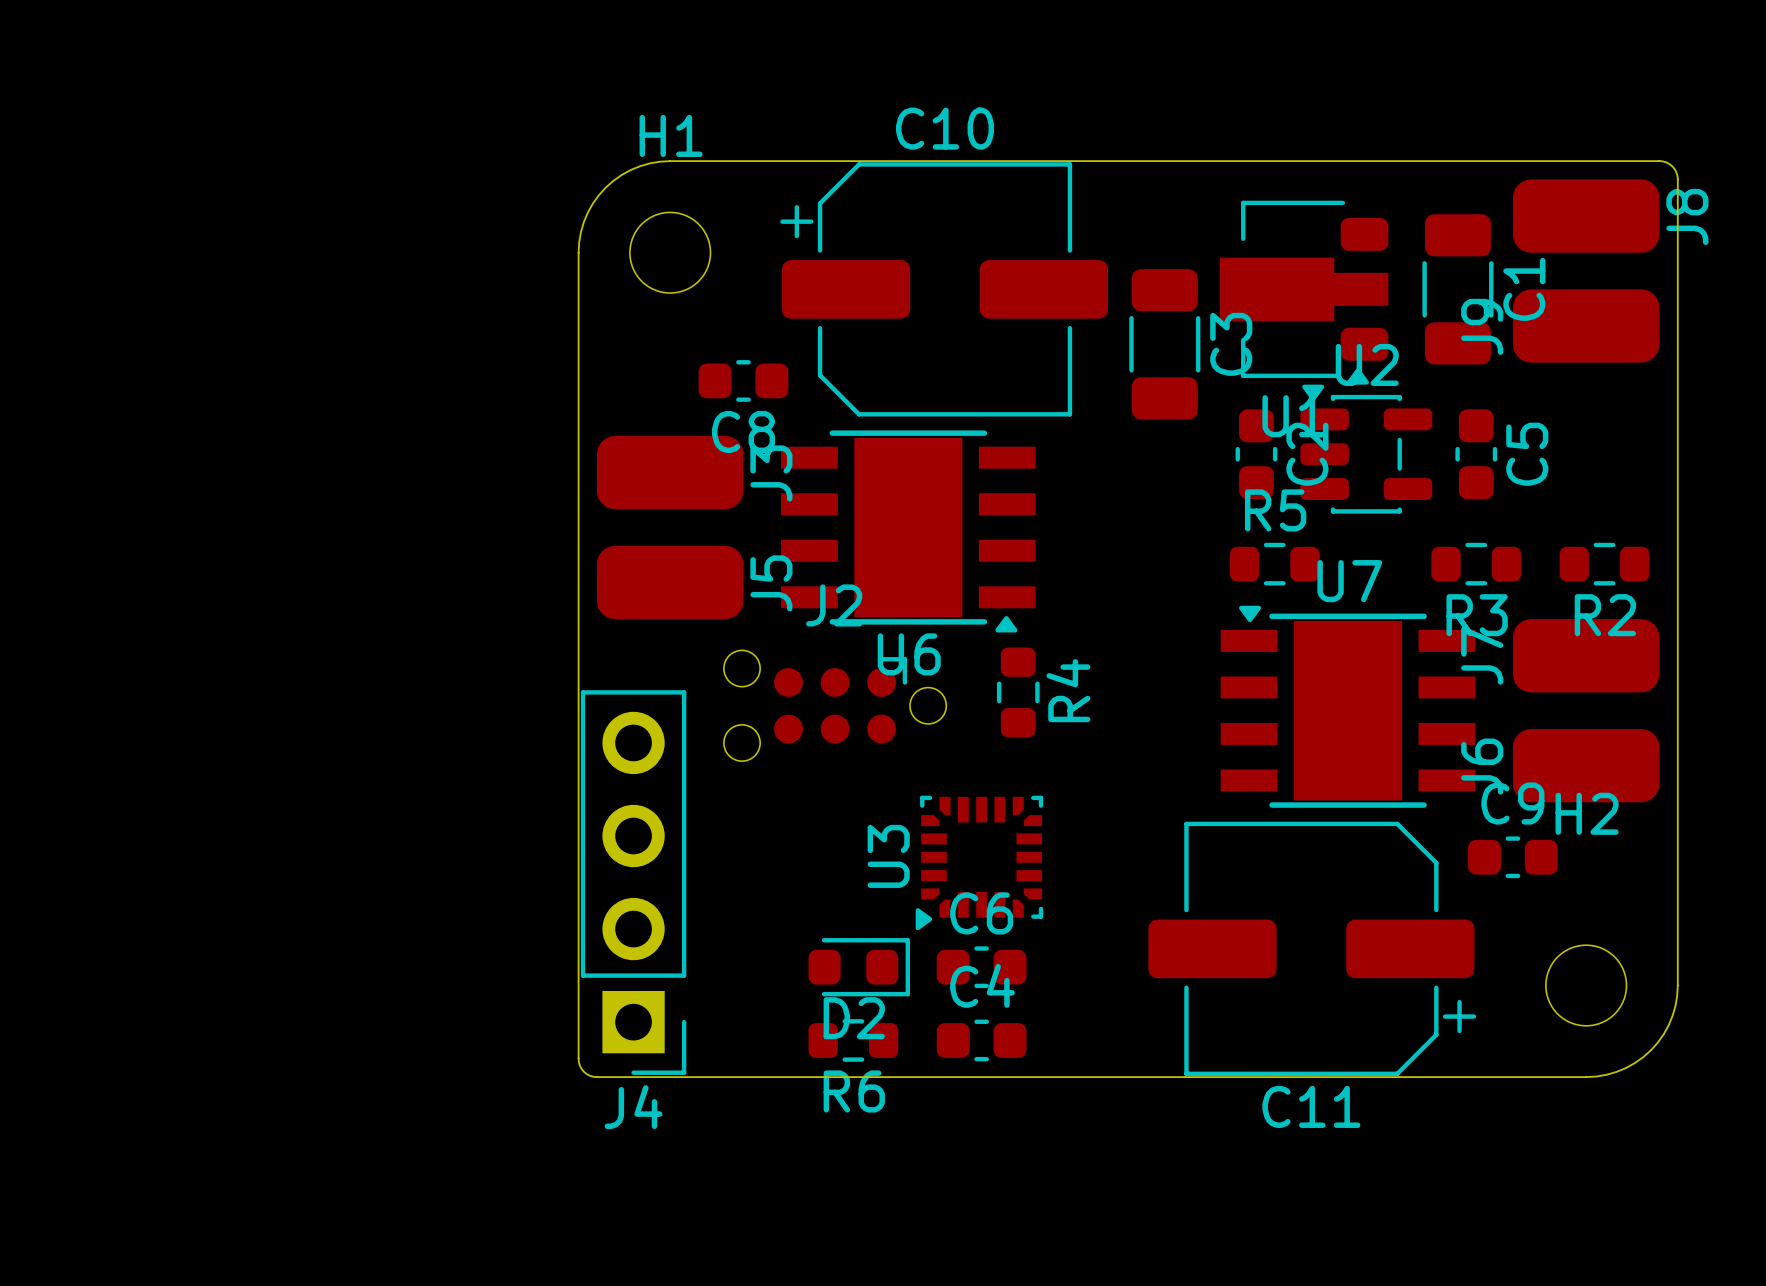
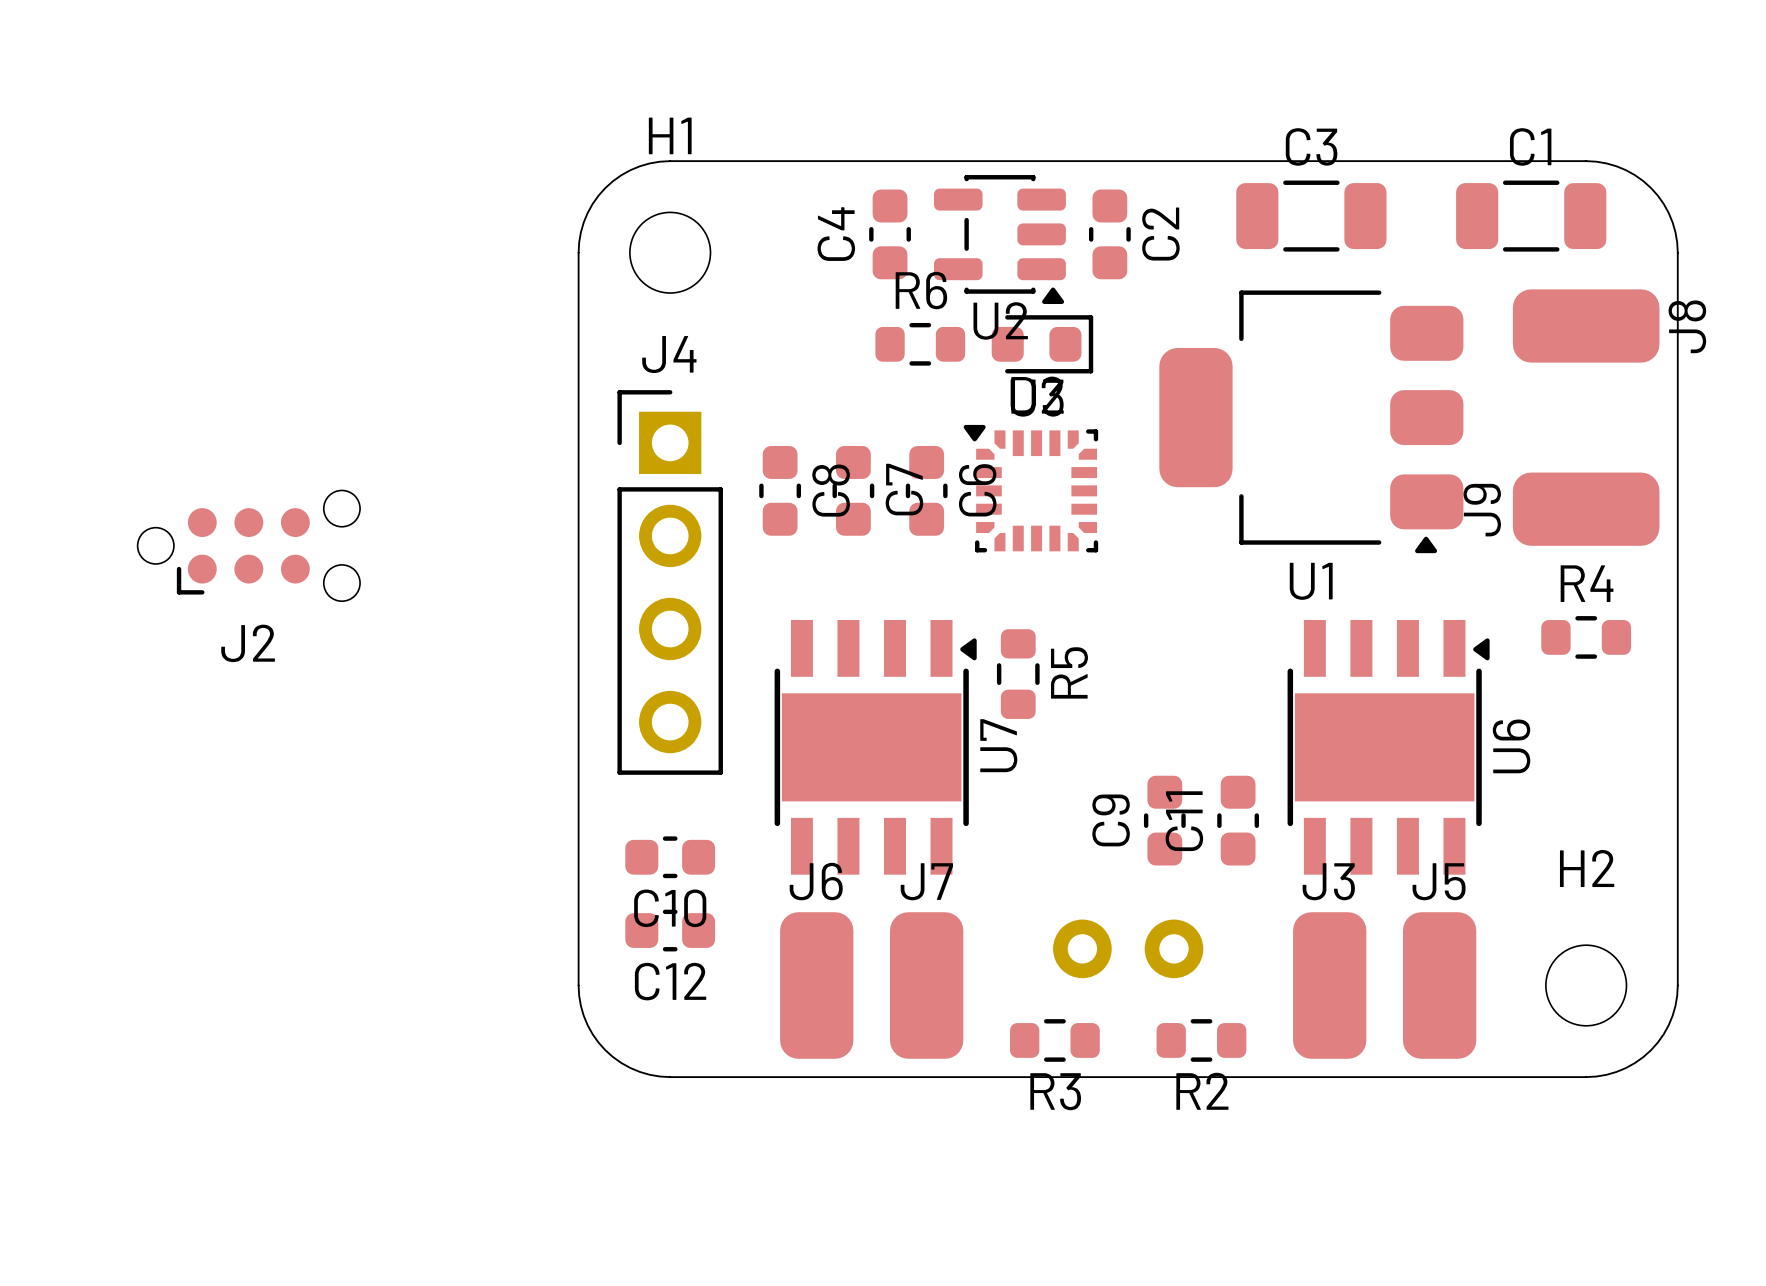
C10 name position: C10 (944, 128) -> C10 (670, 908)
board edge: (1586, 161) (1659, 161) (1672, 166) (1677, 179) (1677, 252) -> (1586, 161) (1616, 166) (1634, 175) (1650, 187) (1668, 212) (1675, 232) (1677, 252)
C10 footprint: [780, 162, 1109, 417] -> [625, 836, 716, 879]
U1 footprint: [1219, 200, 1389, 385] -> [1159, 290, 1464, 554]
J8: (1586, 216) -> none
C1 rotation: 0° (1457, 289) -> 90° clockwise (1531, 216)
C1 position: (1457, 289) -> (1531, 216)
C1 name position: C1 (1524, 289) -> C1 (1530, 146)
J9 name: J9 (1482, 326) -> J8 (1687, 326)
C3 rotation: 0° (1164, 344) -> 90° clockwise (1311, 216)
C3 position: (1164, 344) -> (1311, 216)
C3 name position: C3 (1231, 344) -> C3 (1311, 146)
C8 rotation: 0° (743, 380) -> 90° clockwise (780, 490)
C8 position: (743, 380) -> (780, 490)
C8 name position: C8 (743, 431) -> C8 (831, 490)
U2 rotation: 0° (1366, 449) -> 180° (999, 239)
U2 position: (1366, 449) -> (999, 239)
C2 position: (1256, 454) -> (1109, 234)
C5: (1476, 454) -> none
J3 rotation: 0° (670, 472) -> 90° clockwise (1329, 985)
J3 position: (670, 472) -> (1329, 985)
J3 name position: J3 (771, 473) -> J3 (1328, 881)
C7: none -> (853, 490)
J9: none -> (1586, 509)
U6 rotation: 0° (908, 531) -> 90° counterclockwise (1388, 747)
U6 position: (908, 531) -> (1388, 747)
R5 rotation: 0° (1274, 564) -> 90° clockwise (1018, 674)
R5 position: (1274, 564) -> (1018, 674)
R3 position: (1476, 564) -> (1054, 1040)
R2 position: (1604, 564) -> (1201, 1040)
J5 rotation: 0° (670, 582) -> 90° clockwise (1439, 985)
J5 position: (670, 582) -> (1439, 985)
J5 name position: J5 (771, 583) -> J5 (1439, 881)
J7 rotation: 0° (1586, 655) -> 90° clockwise (926, 985)
J7 position: (1586, 655) -> (926, 985)
R4 name position: R4 (1068, 690) -> R4 (1587, 583)
R4 rotation: 0° (1018, 692) -> 90° clockwise (1586, 637)
R4 position: (1018, 692) -> (1586, 637)
J2 rotation: 0° (835, 705) -> 180° (248, 545)
J2 position: (835, 705) -> (248, 545)
U7 rotation: 0° (1348, 706) -> 90° clockwise (875, 747)
U7 position: (1348, 706) -> (875, 747)
J6 rotation: 0° (1586, 765) -> 90° clockwise (816, 985)
J6 position: (1586, 765) -> (816, 985)
C9 name position: C9 (1512, 803) -> C9 (1111, 820)
H2 name position: H2 (1587, 813) -> H2 (1587, 868)
C11 footprint: [1148, 821, 1477, 1077] -> [1217, 775, 1259, 866]
C9 rotation: 0° (1512, 857) -> 90° clockwise (1164, 820)
C9 position: (1512, 857) -> (1164, 820)
U3 rotation: 0° (979, 862) -> 90° clockwise (1030, 488)
U3 position: (979, 862) -> (1030, 488)
J4 rotation: 0° (633, 882) -> 180° (670, 582)
J4 position: (633, 882) -> (670, 582)
C12: none -> (670, 930)
part: none -> (1128, 948)
D2 position: (859, 967) -> (1042, 344)
C6 rotation: 0° (981, 967) -> 90° clockwise (926, 490)
C6 position: (981, 967) -> (926, 490)
board edge: (578, 985) (578, 1058) (583, 1071) (596, 1077) (670, 1077) -> (578, 985) (583, 1015) (592, 1034) (605, 1050) (621, 1063) (639, 1071) (670, 1077)
C4 name position: C4 (982, 985) -> C4 (836, 234)
R6 position: (853, 1040) -> (920, 344)
C4 rotation: 0° (981, 1040) -> 90° clockwise (890, 234)
C4 position: (981, 1040) -> (890, 234)
R6 name position: R6 (854, 1091) -> R6 (921, 290)
C11 name position: C11 (1311, 1106) -> C11 (1184, 821)

